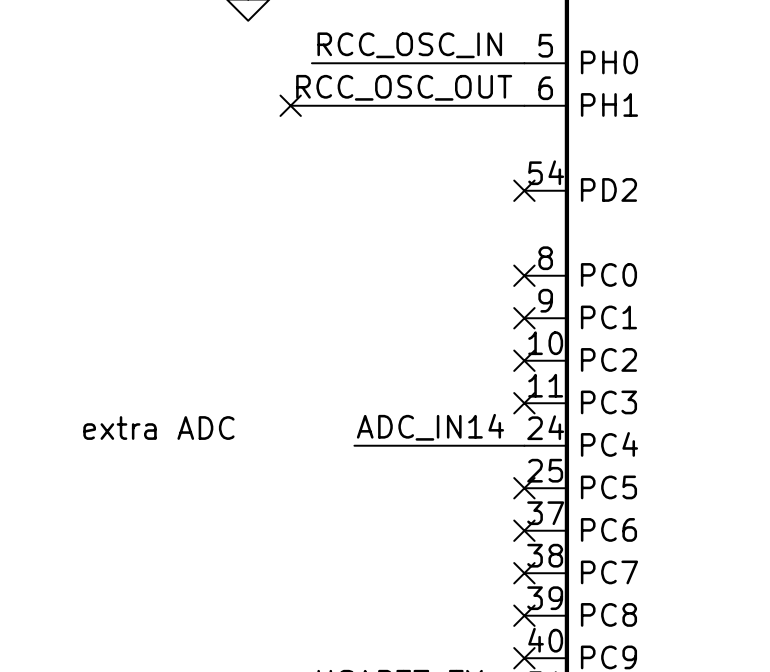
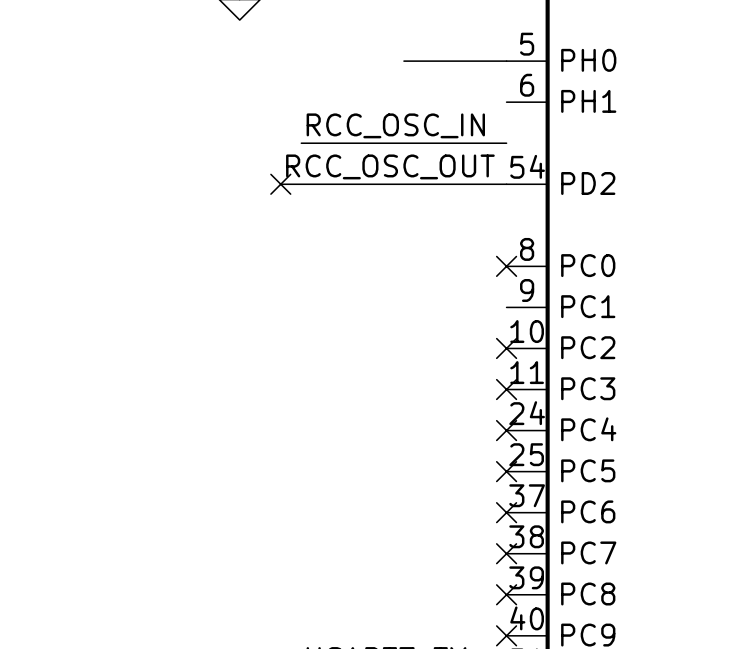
label position: RCC_OSC_IN (409, 45) -> RCC_OSC_IN (395, 125)
wire: (311, 63) (418, 63) -> none
label position: RCC_OSC_OUT (404, 87) -> RCC_OSC_OUT (390, 166)
wire: (290, 105) (524, 105) -> (280, 184) (506, 184)
no-connect mark position: (290, 105) -> (280, 184)
wire: none -> (301, 143) (506, 143)
no-connect mark: (524, 190) -> none
no-connect mark: (524, 318) -> none
label: ADC_IN14 (430, 427) -> none
text: extra ADC (158, 428) -> none
wire: (354, 445) (524, 445) -> none
no-connect mark: none -> (506, 430)

